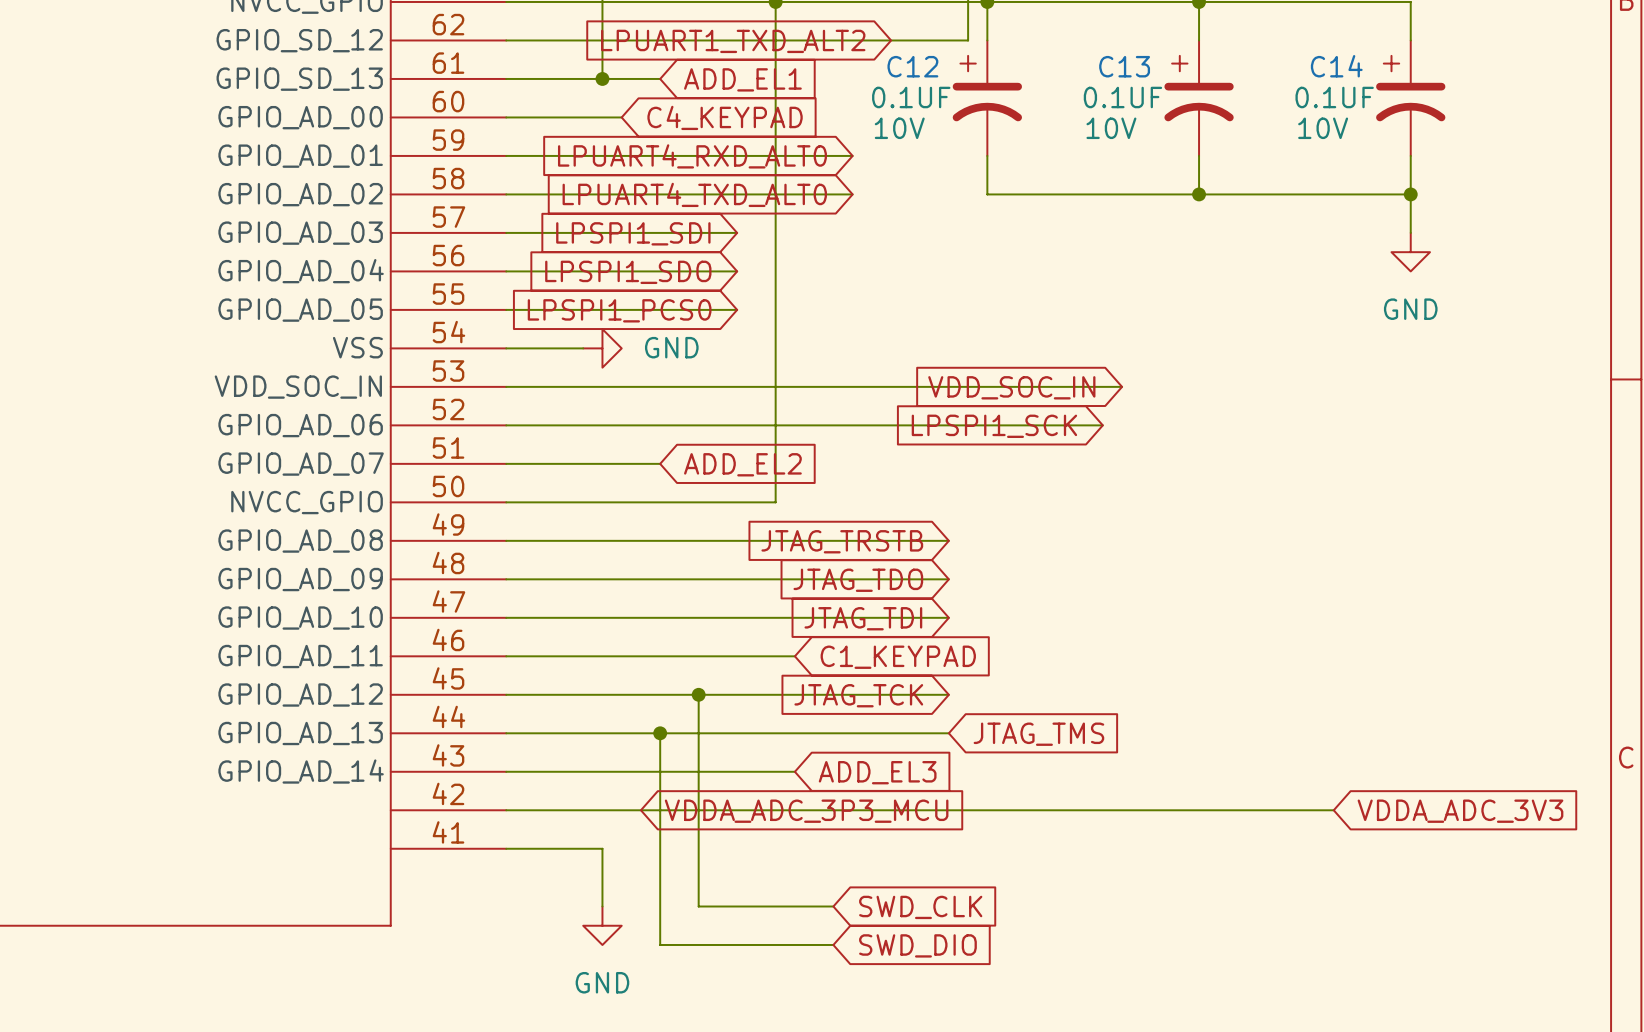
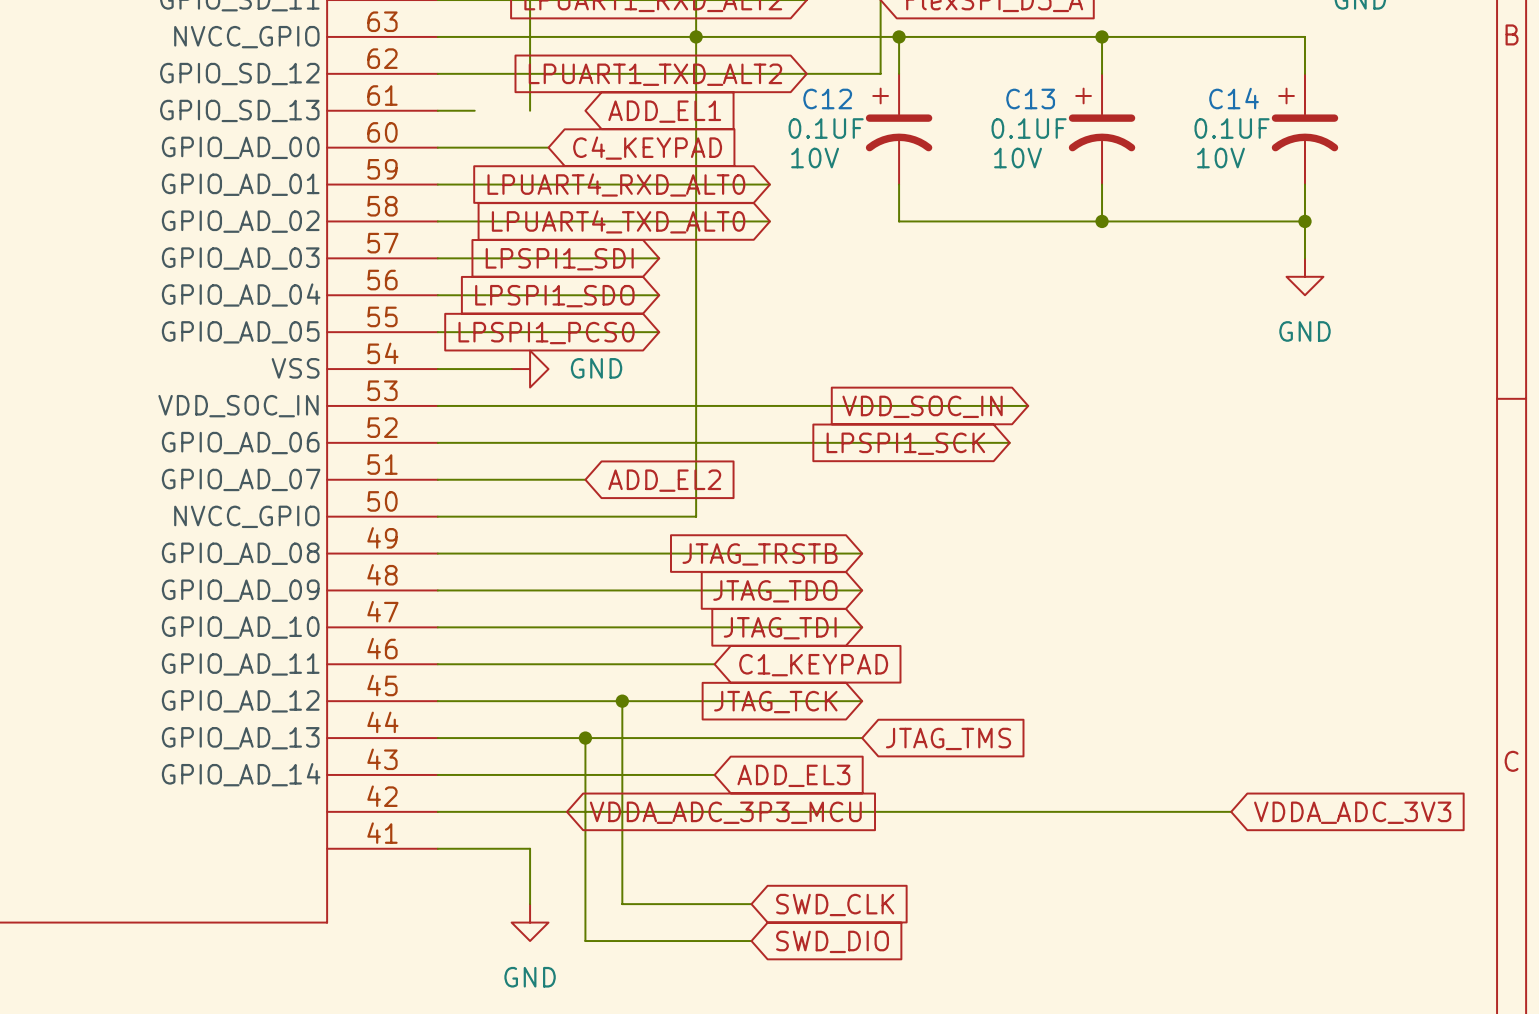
wire: (544, 78) (660, 78) -> none
junction: (602, 78) -> none

